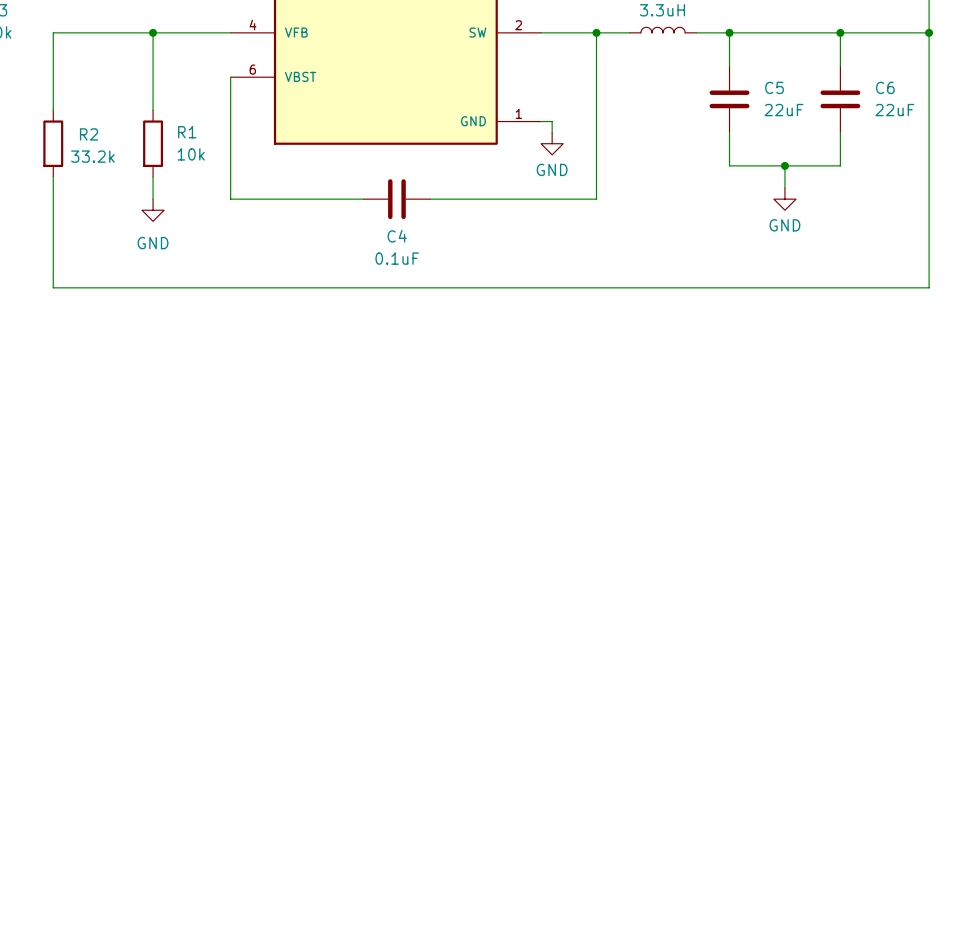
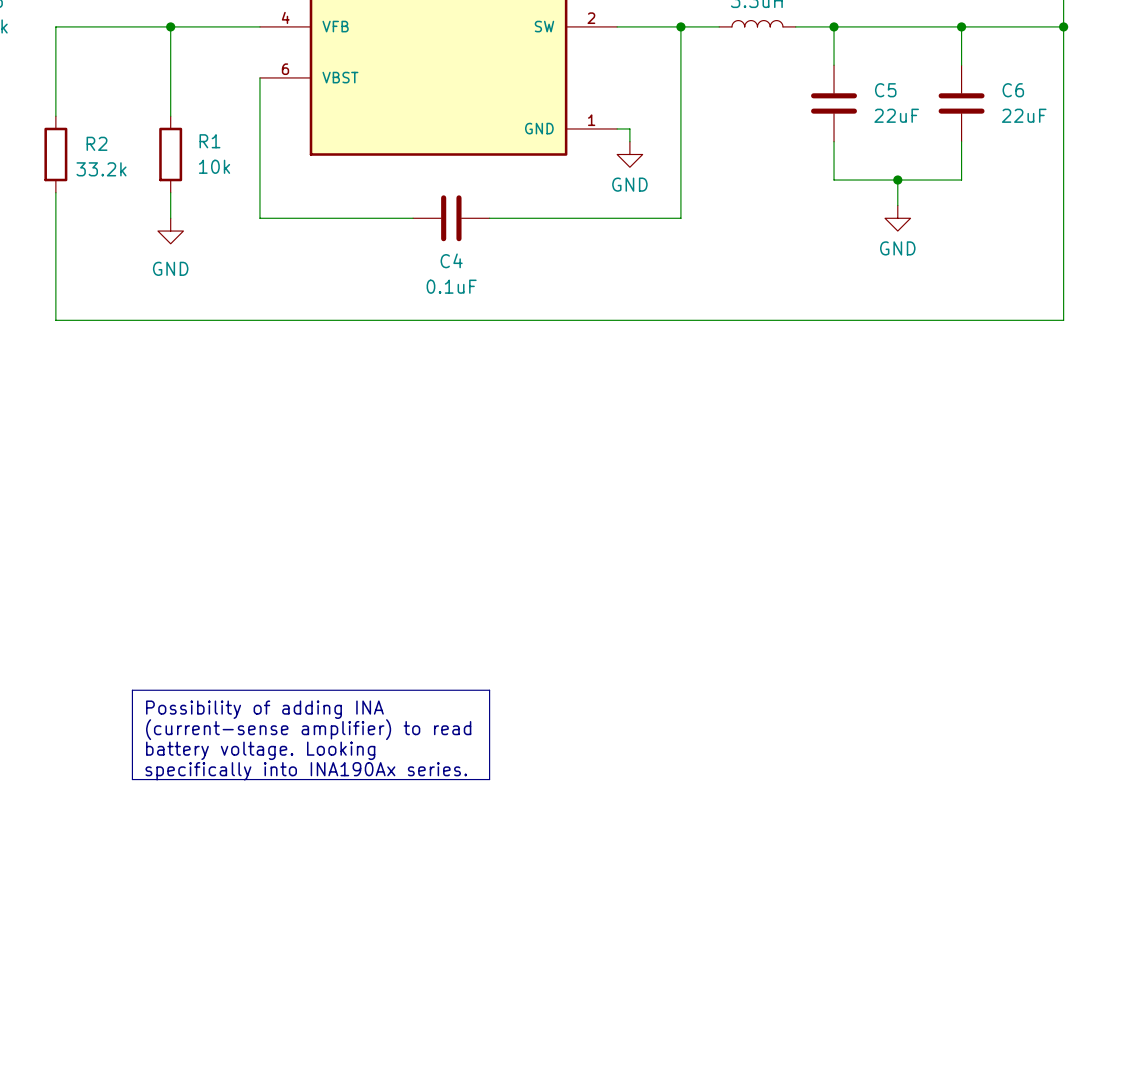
line: none -> (132, 690) (489, 690) (489, 779) (132, 779) (132, 690)
text: none -> Possibility of adding INA (264, 709)
text: none -> (current-sense amplifier) to read (308, 729)
text: none -> battery voltage. Looking (260, 750)
text: none -> specifically into INA190Ax series. (306, 771)

